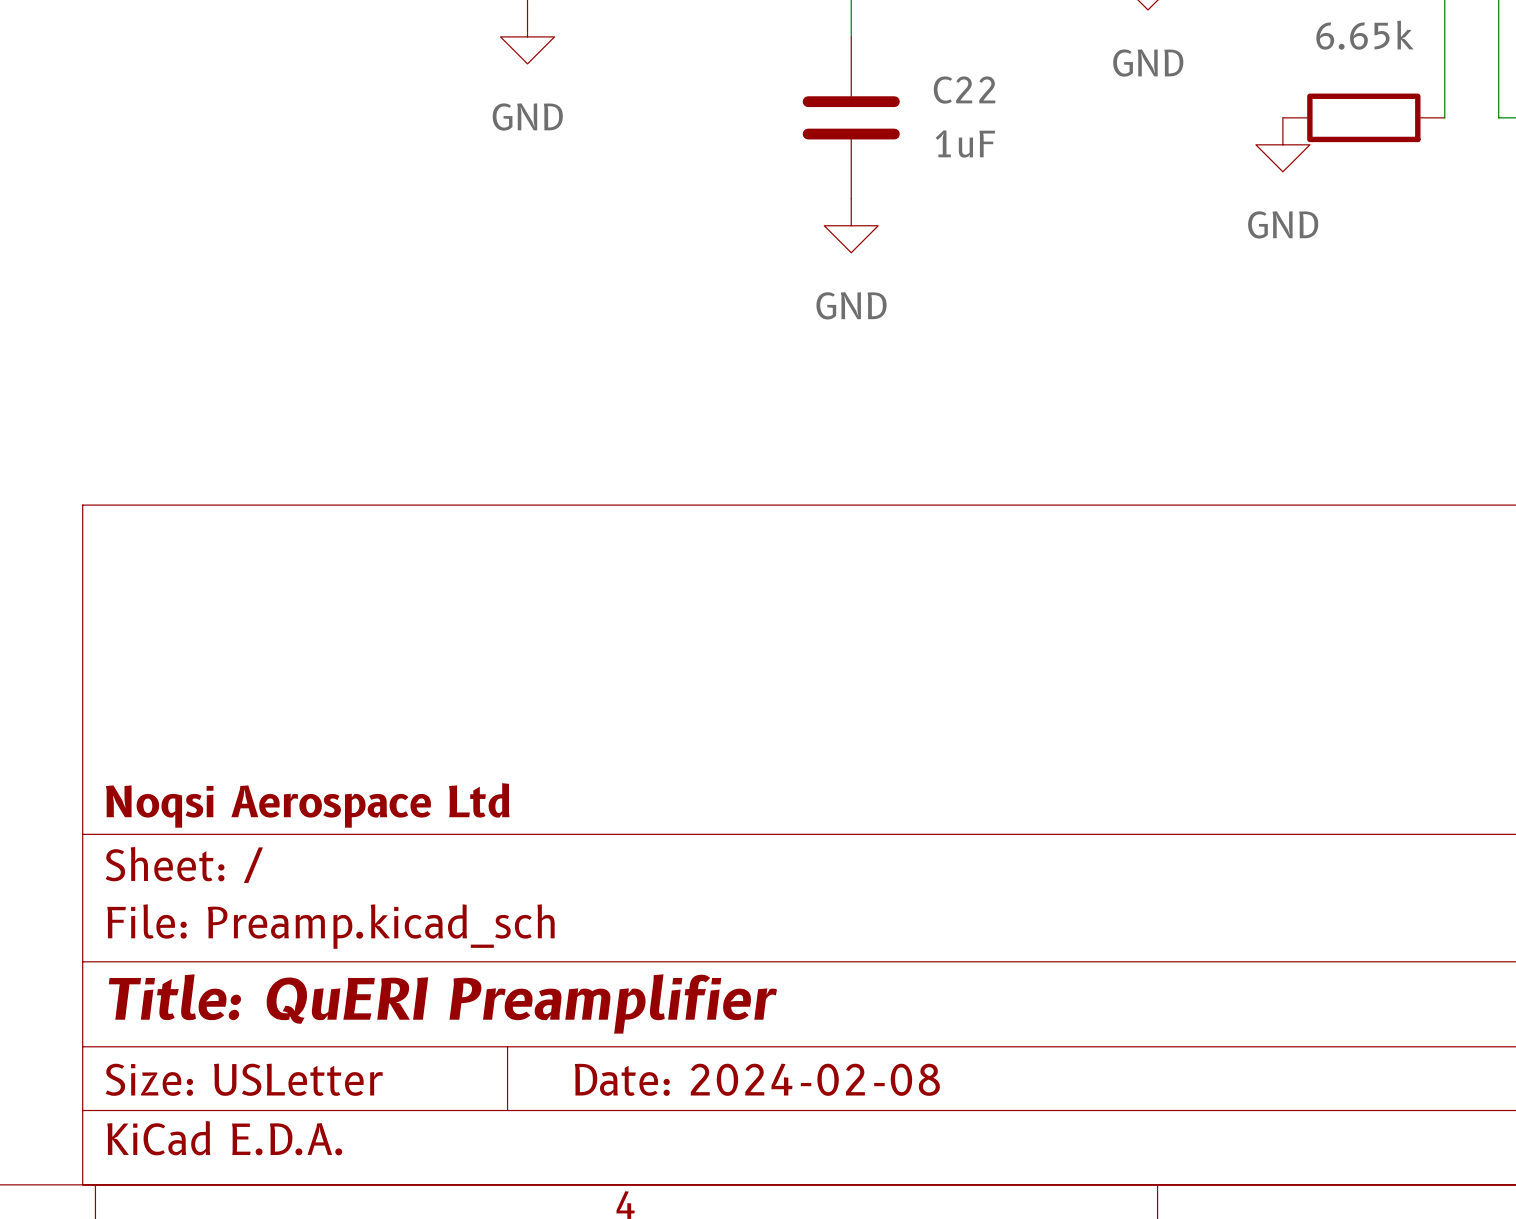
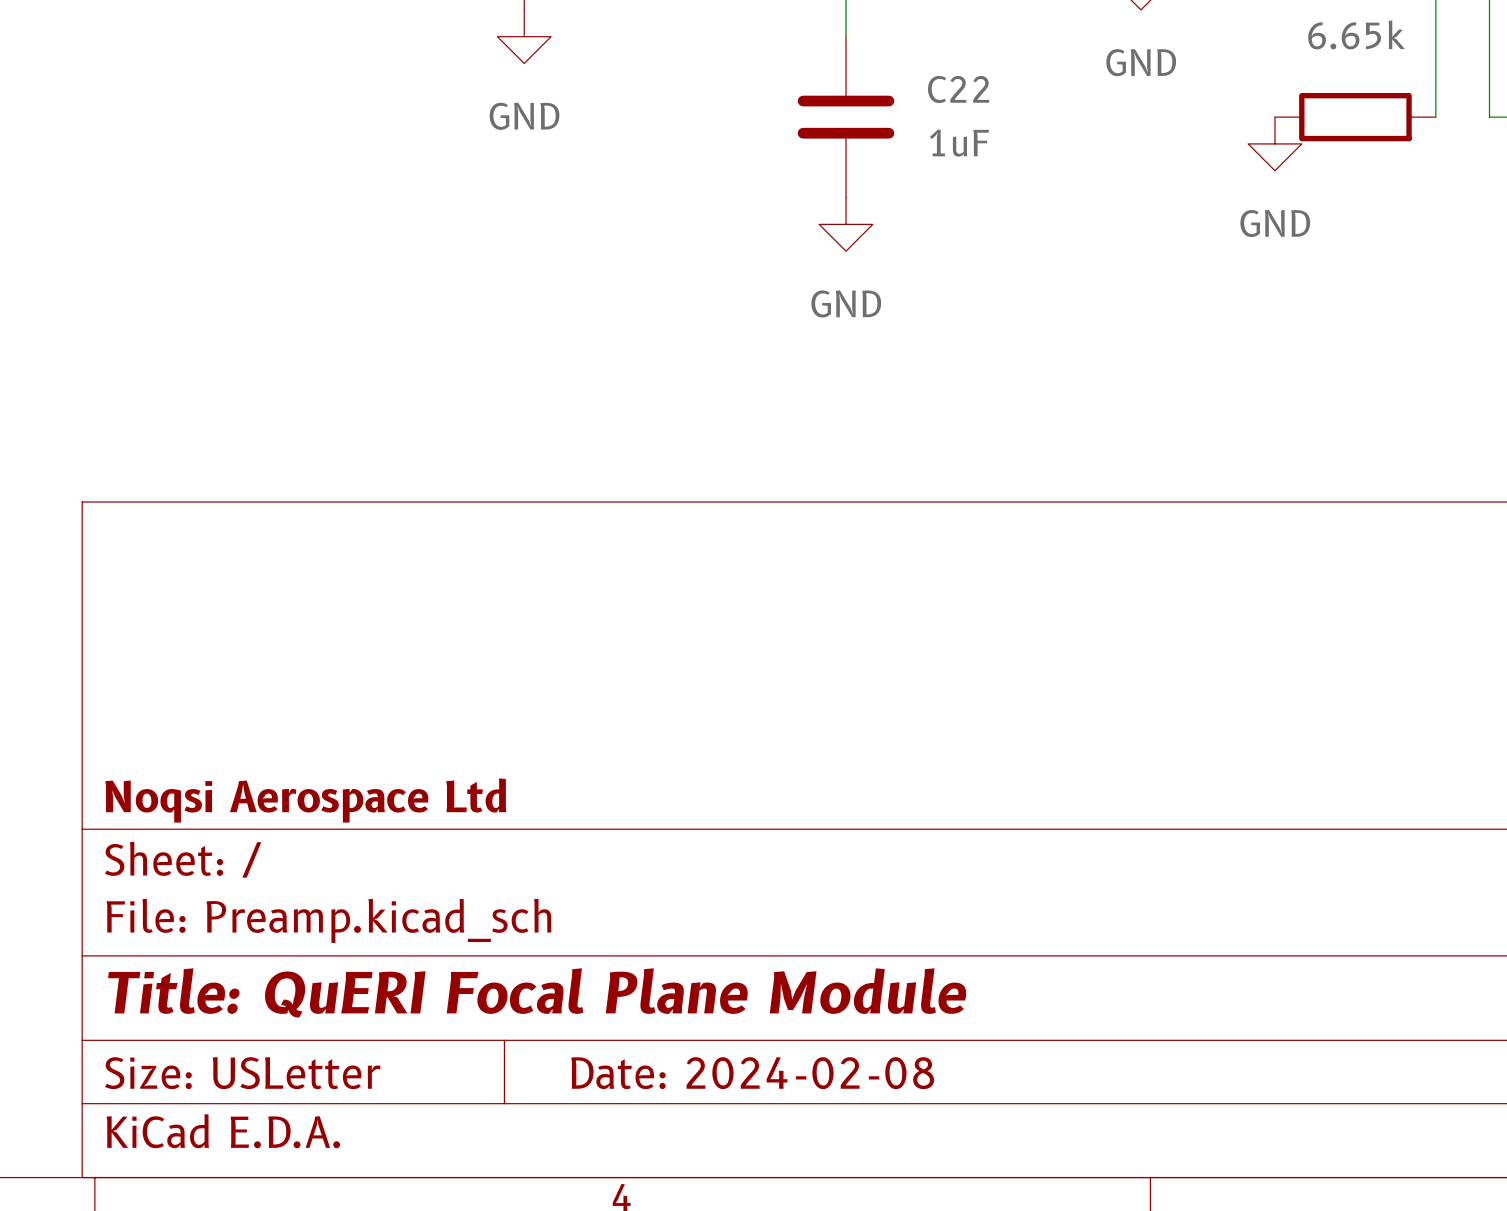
title block: Title: QuERI Preamplifier (442, 1003) -> Title: QuERI Focal Plane Module (537, 992)

